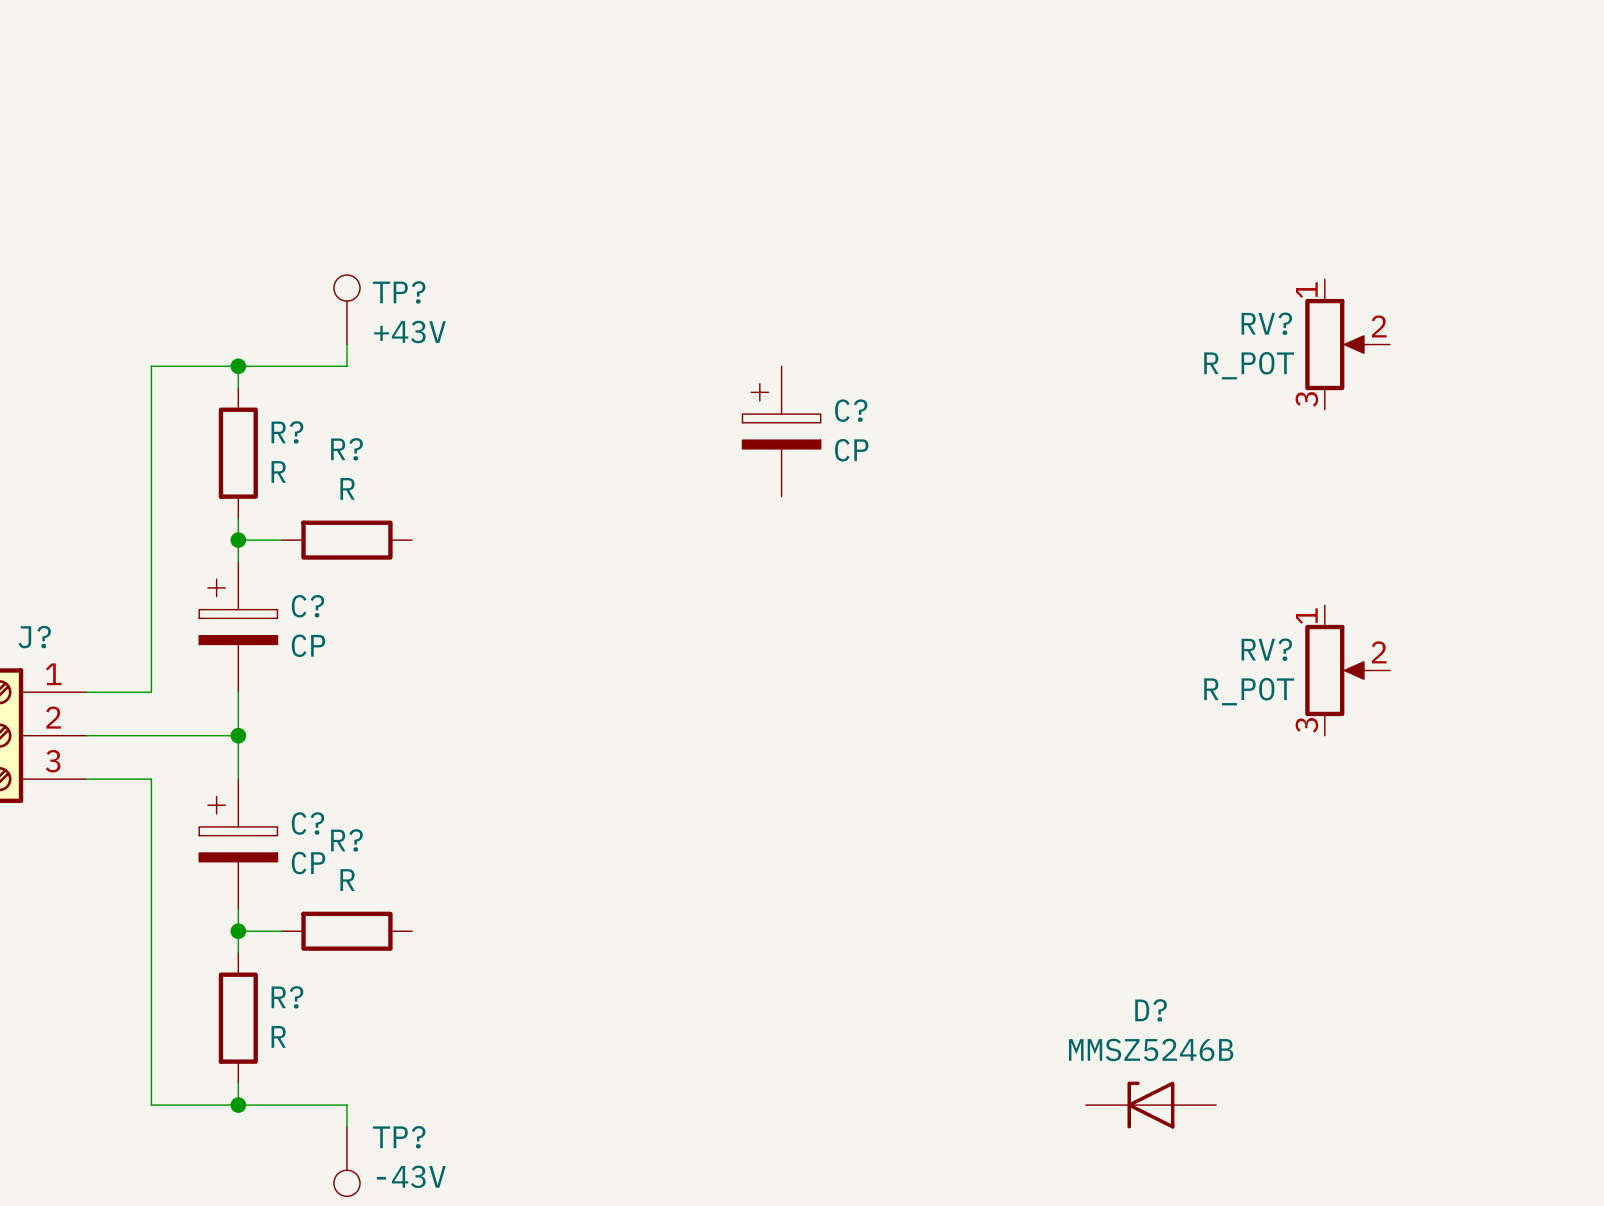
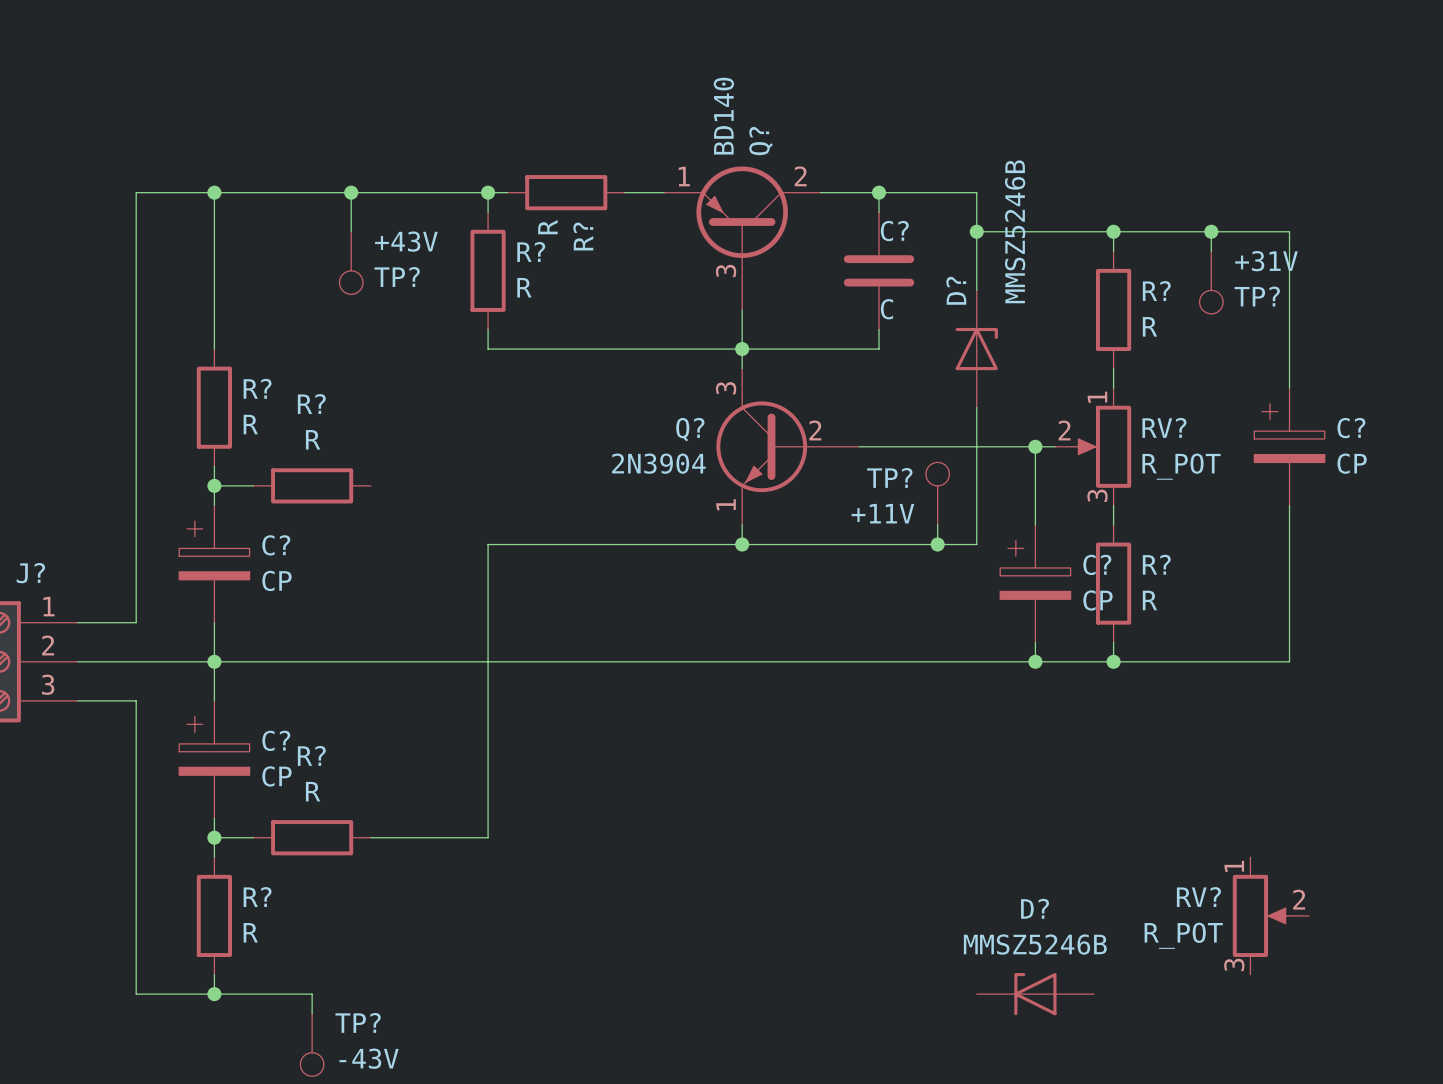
wire: none -> (214, 192) (214, 329)
junction: none -> (214, 192)
wire: none -> (351, 192) (351, 231)
junction: none -> (351, 192)
wire: none -> (488, 192) (488, 212)
junction: none -> (488, 192)
R?: none -> R (566, 192)
wire: none -> (624, 192) (663, 192)
wire: none -> (820, 192) (976, 192) (976, 290)
wire: none -> (879, 192) (879, 212)
junction: none -> (879, 192)
wire: none -> (976, 231) (1289, 231) (1289, 388)
junction: none -> (976, 231)
wire: none -> (1113, 231) (1113, 251)
junction: none -> (1113, 231)
wire: none -> (1211, 231) (1211, 251)
junction: none -> (1211, 231)
Q?: none -> BD140 (742, 238)
TP? rotation: 0° (346, 288) -> 180° (351, 282)
R?: none -> R (488, 270)
C?: none -> C (879, 270)
TP? position: (346, 309) -> (351, 263)
TP?: none -> +31V (1211, 282)
TP? value position: +43V (409, 332) -> +43V (406, 241)
wire: (346, 344) (346, 366) (151, 366) -> (507, 192) (136, 192) (136, 329)
wire: none -> (742, 309) (742, 368)
R?: none -> R (1113, 309)
RV?: R_POT (1347, 344) -> none
junction: (238, 366) -> none
wire: none -> (488, 329) (488, 349) (879, 349) (879, 329)
junction: none -> (742, 349)
D?: none -> MMSZ5246B (976, 349)
wire: none -> (1113, 368) (1113, 388)
C?: CP (781, 431) -> none
wire: none -> (976, 407) (976, 544) (488, 544) (488, 837) (370, 837)
Q?: none -> 2N3904 (787, 446)
wire: none -> (859, 446) (1054, 446)
wire: none -> (1035, 446) (1035, 524)
junction: none -> (1035, 446)
RV?: none -> R_POT (1093, 446)
C?: none -> CP (1289, 446)
TP?: none -> +11V (937, 493)
wire: none -> (1113, 505) (1113, 524)
wire: none -> (1289, 505) (1289, 661) (214, 661)
wire: none -> (742, 524) (742, 544)
wire: none -> (937, 524) (937, 544)
junction: none -> (742, 544)
junction: none -> (937, 544)
C?: none -> CP (1035, 583)
R?: none -> R (1113, 583)
RV?: R_POT (1347, 670) -> none
wire: none -> (1035, 642) (1035, 661)
wire: none -> (1113, 642) (1113, 661)
junction: none -> (1035, 661)
junction: none -> (1113, 661)
RV?: none -> R_POT (1270, 915)

